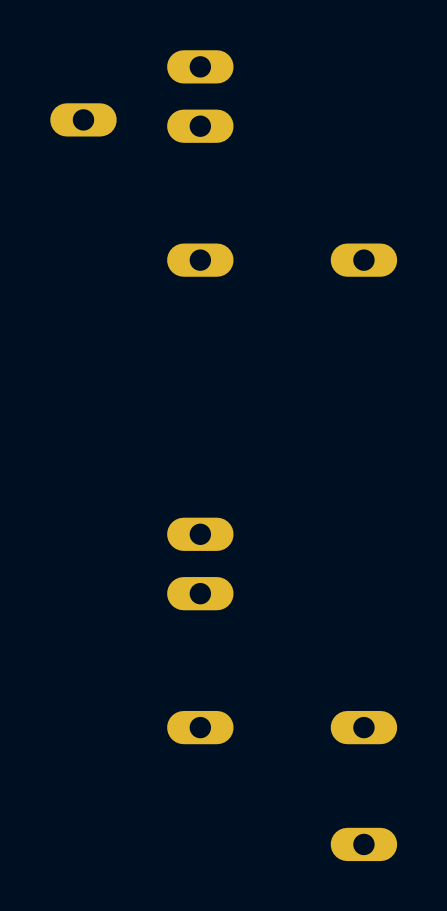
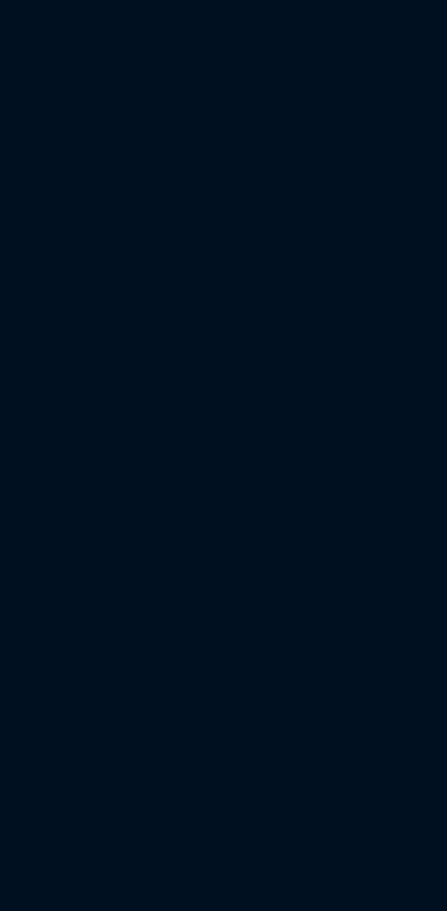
part: (200, 96) -> none
part: (83, 119) -> none
part: (200, 260) -> none
part: (363, 260) -> none
part: (200, 563) -> none
part: (200, 727) -> none
part: (363, 727) -> none
part: (363, 844) -> none

